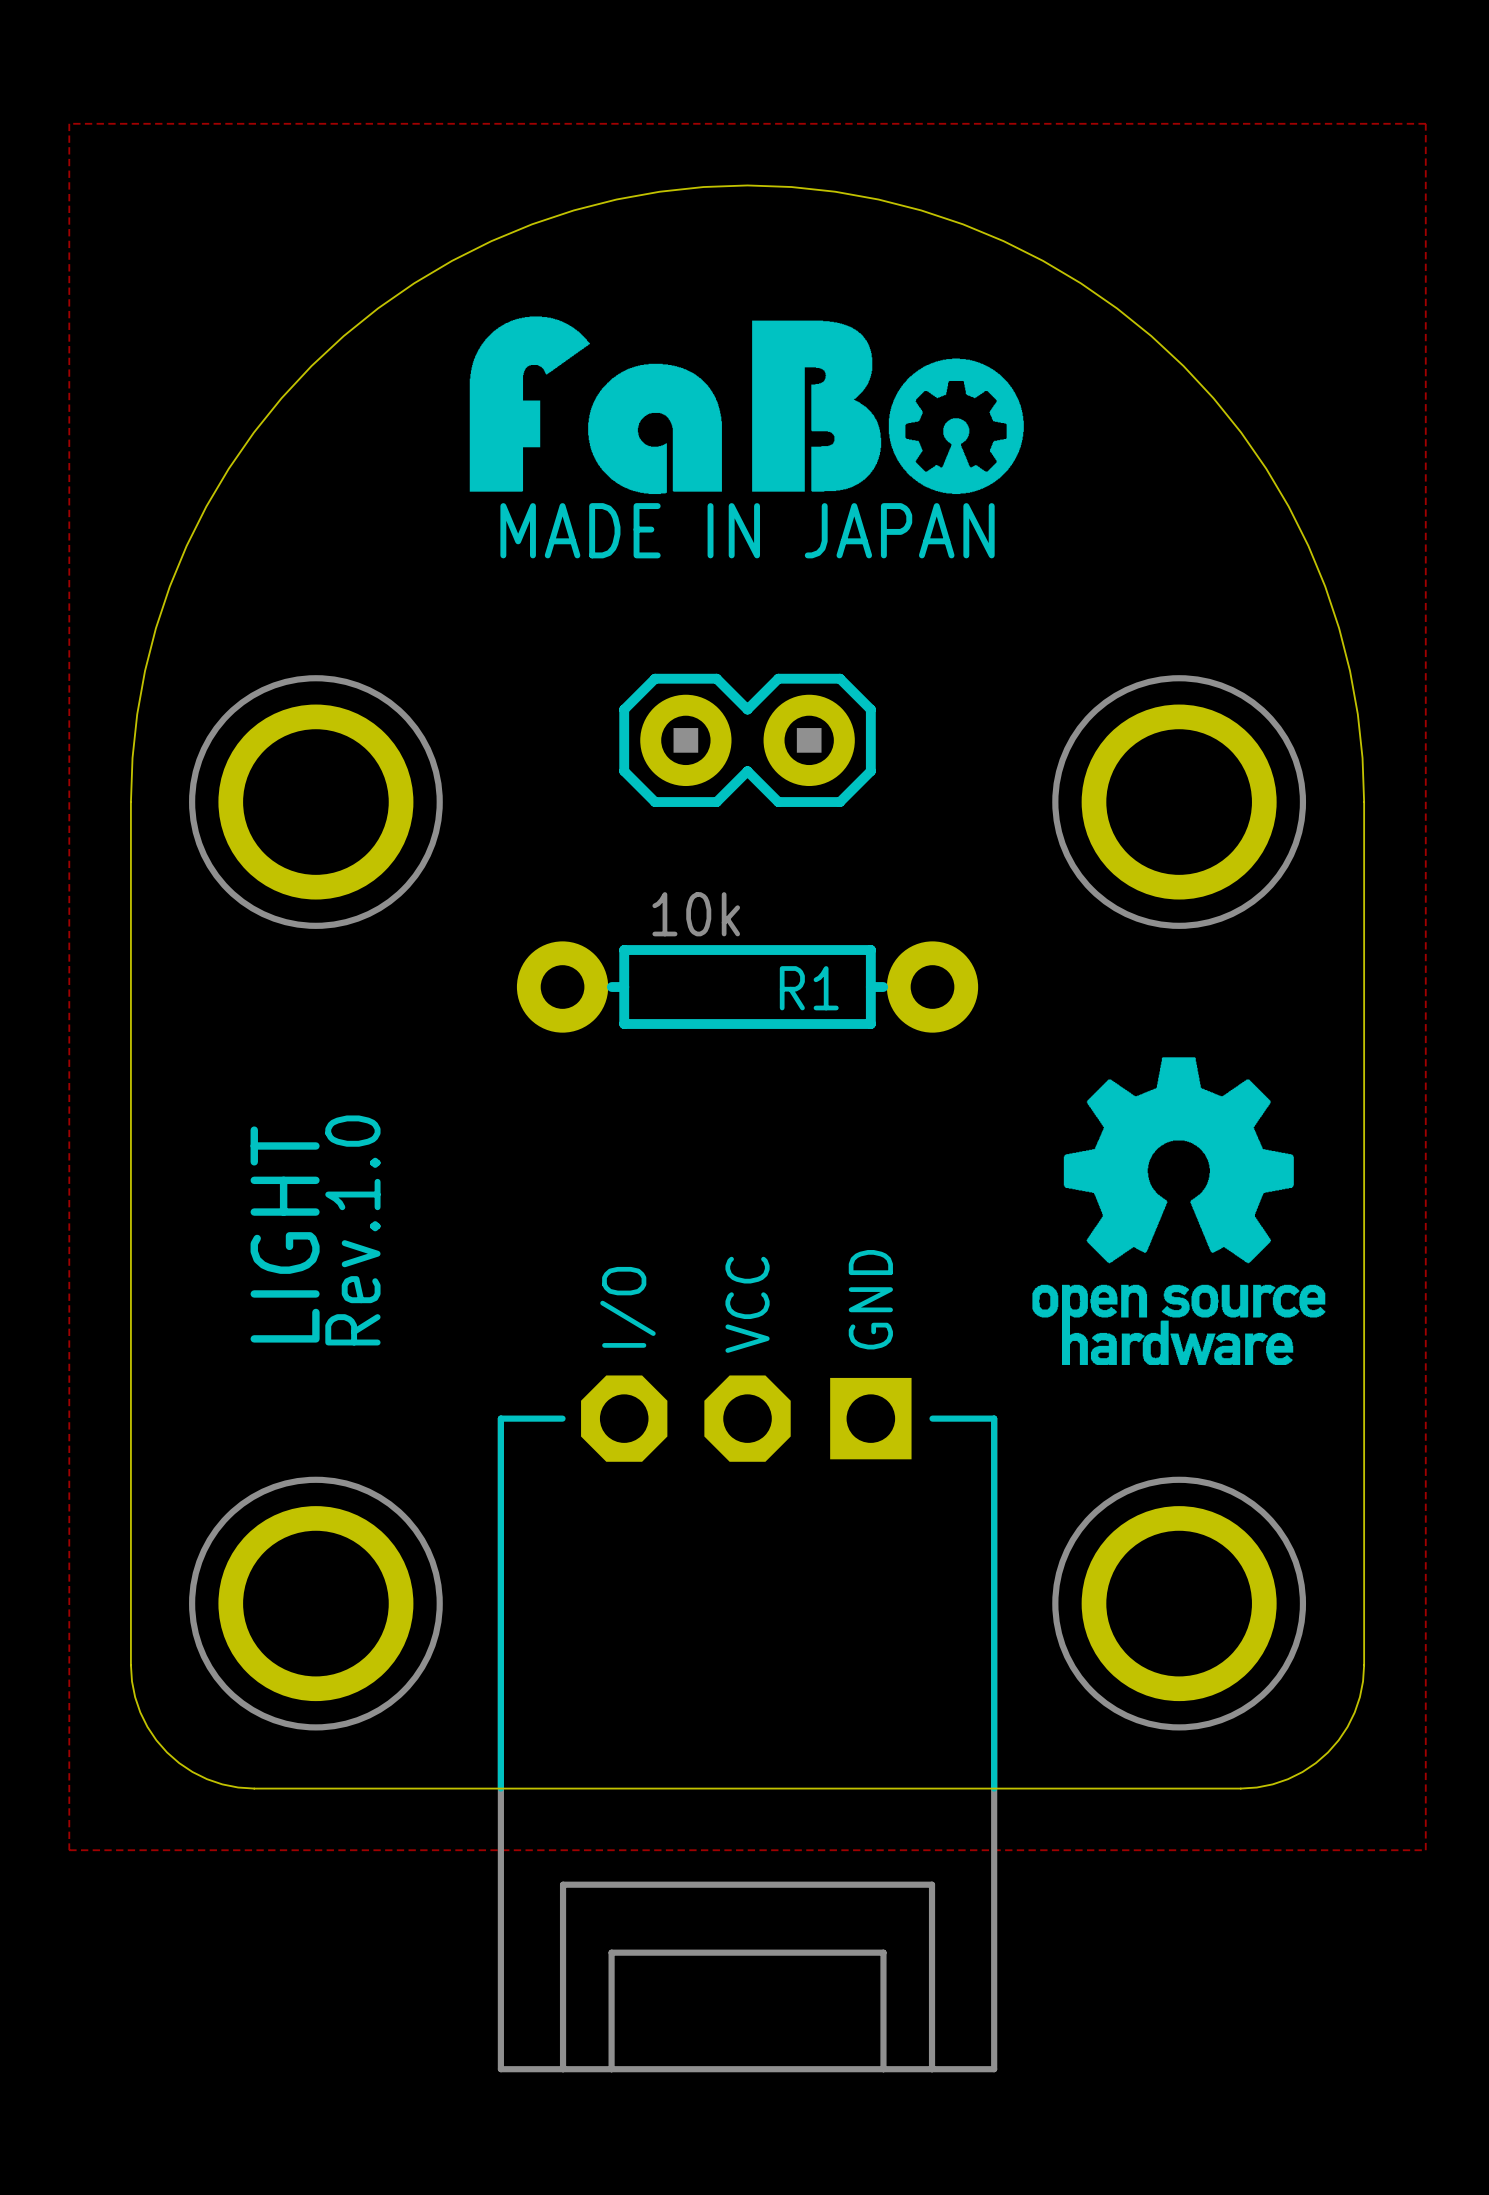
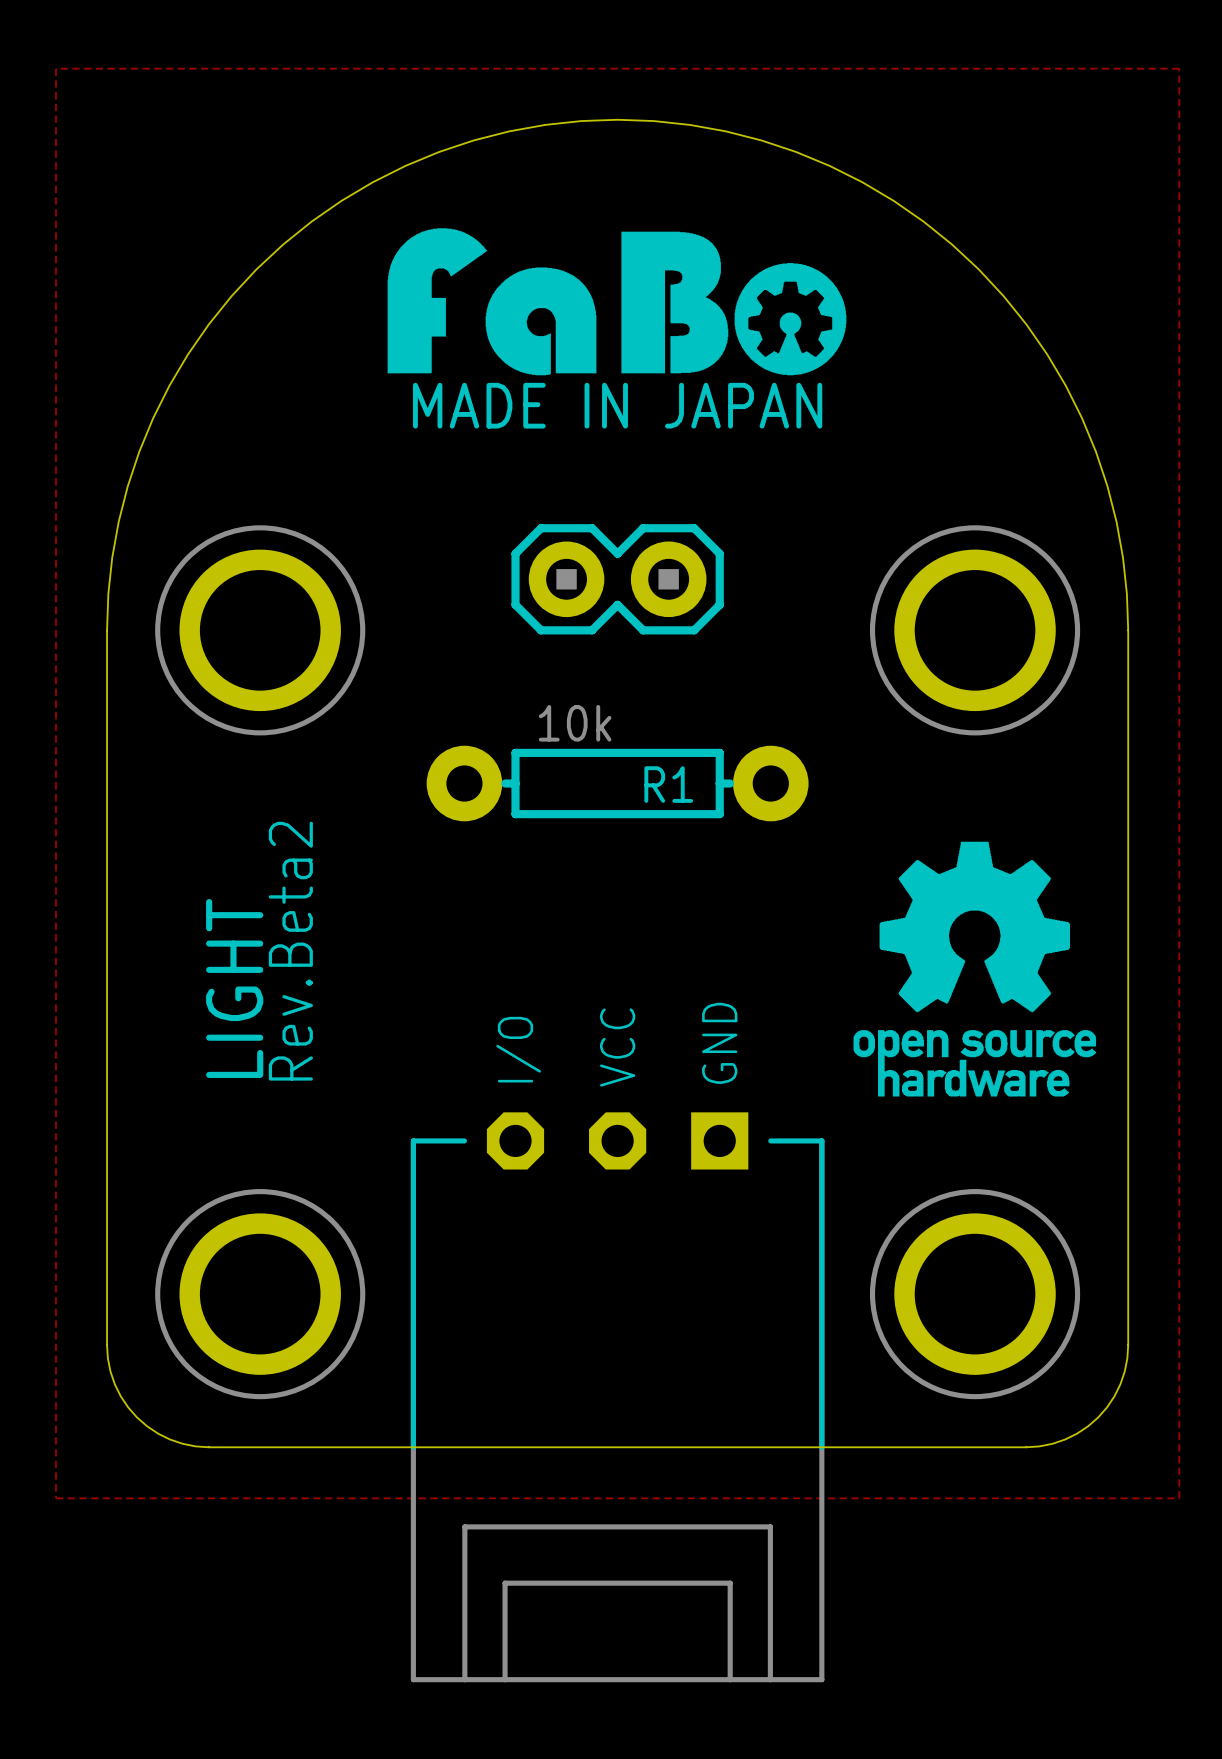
part footprint: [130, 185, 1365, 2073] -> [107, 119, 1129, 1683]
text: Rev.1.0 (352, 1230) -> Rev.Beta2 (290, 951)

